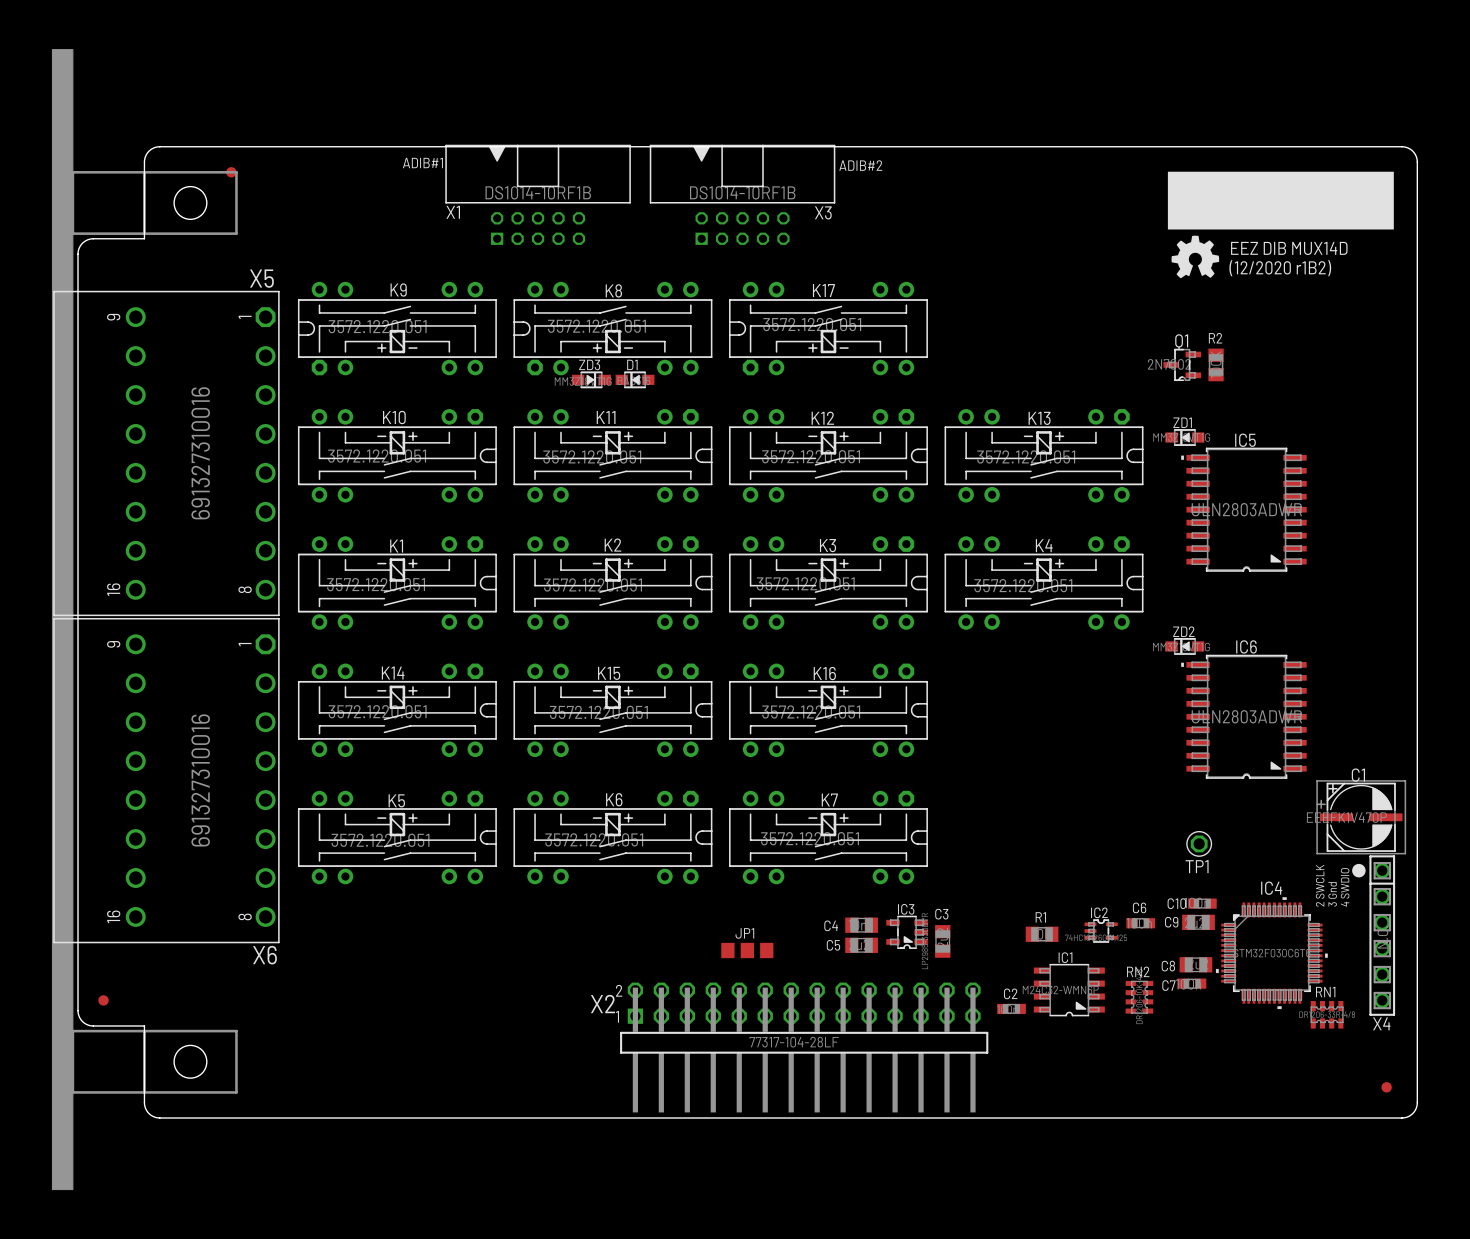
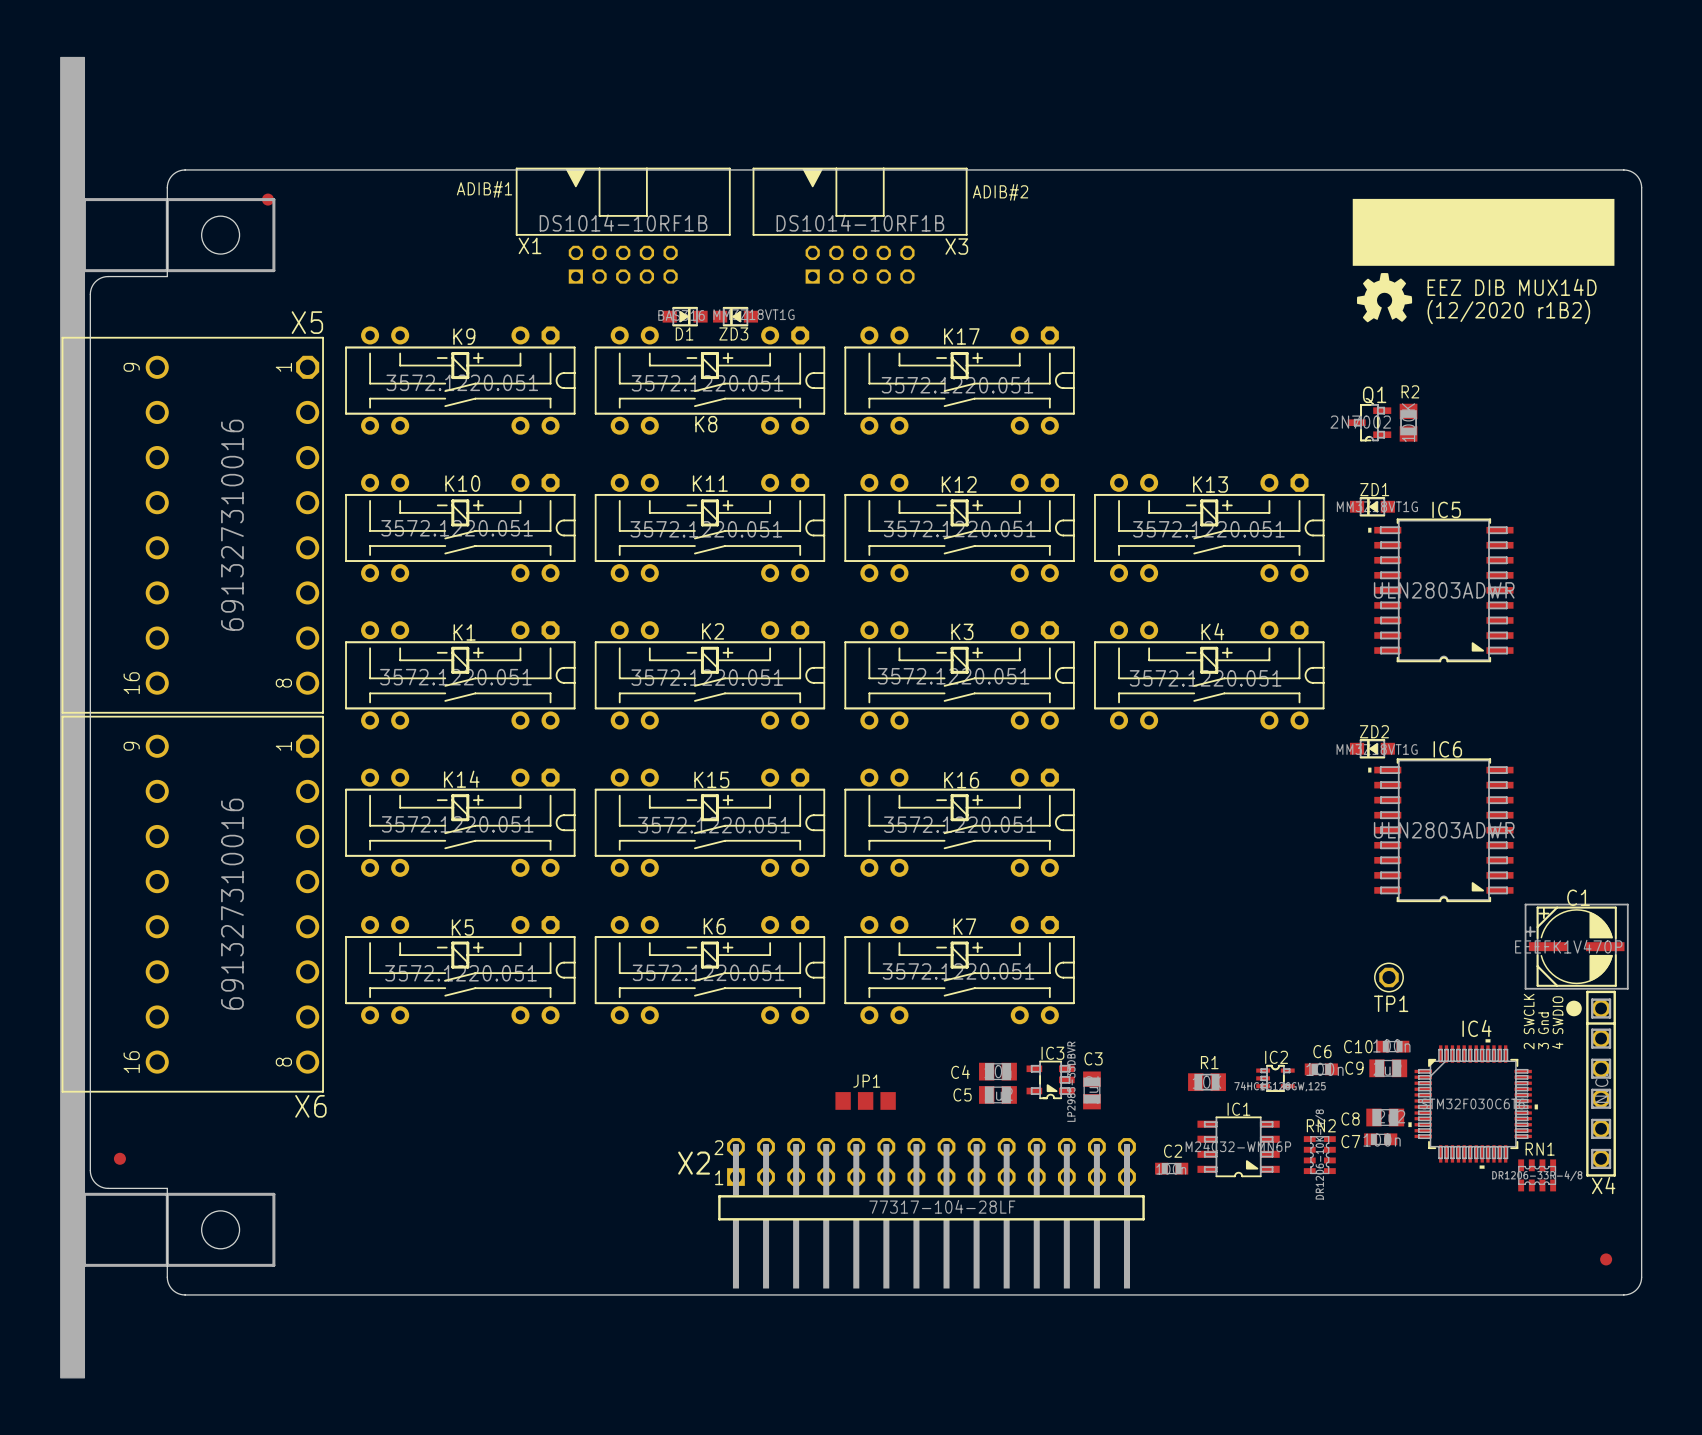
K9 rotation: 0° (397, 328) -> 180° (460, 380)
K8 rotation: 0° (612, 328) -> 180° (709, 380)
K17 rotation: 0° (828, 328) -> 180° (959, 380)
ZD3 rotation: 0° (591, 379) -> 180° (735, 316)
ZD3 position: (591, 379) -> (735, 316)
D1 rotation: 0° (635, 379) -> 180° (685, 316)
D1 position: (635, 379) -> (685, 316)

